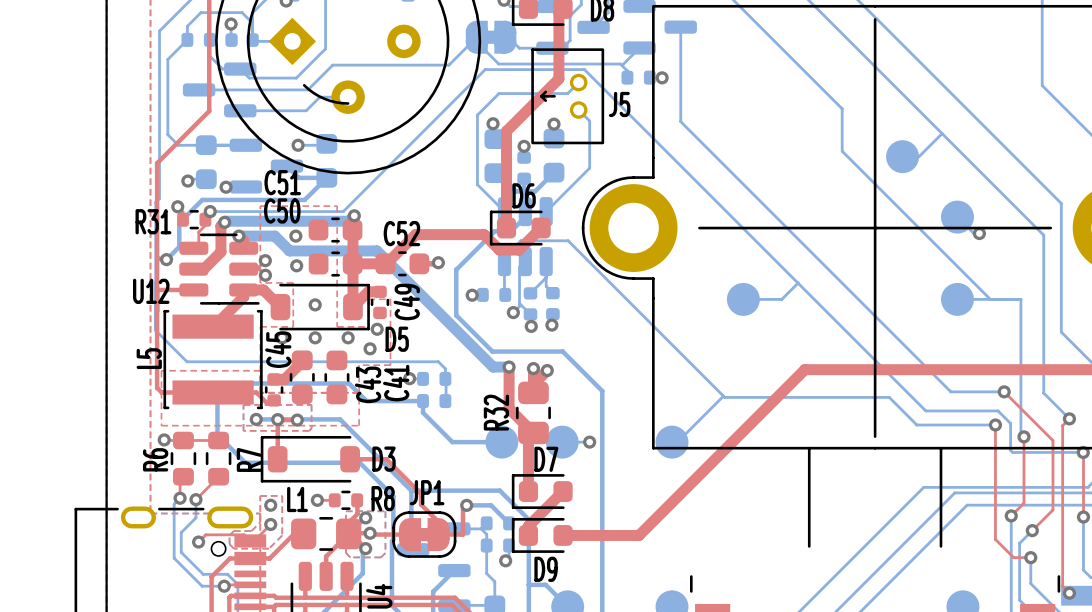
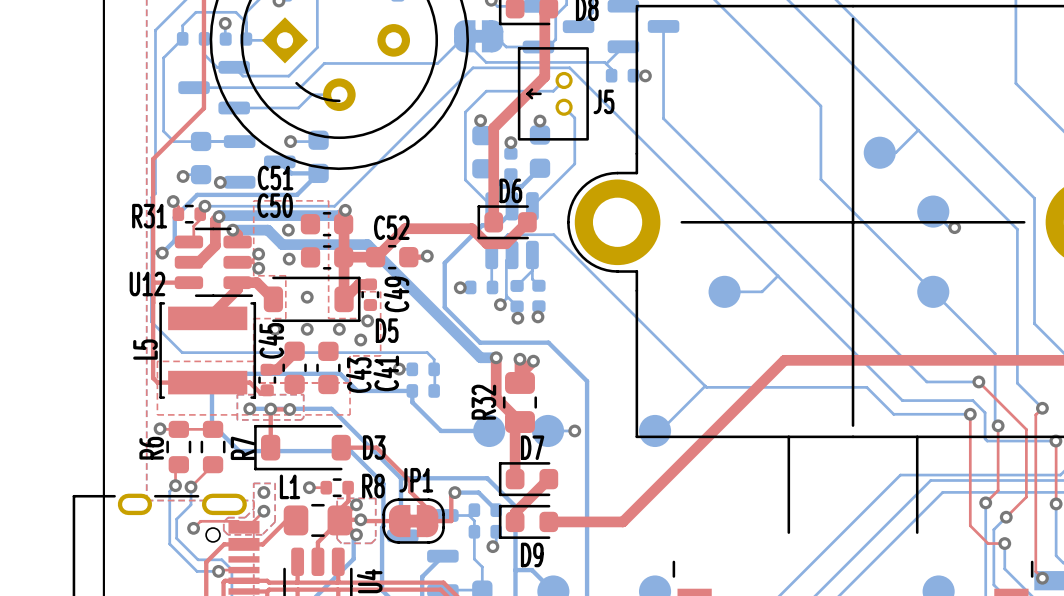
bottom track: (842, 151) (990, 299) -> (820, 147) (820, 179) (995, 353)
bottom track: (957, 299) (1020, 299) (1020, 362) -> none

